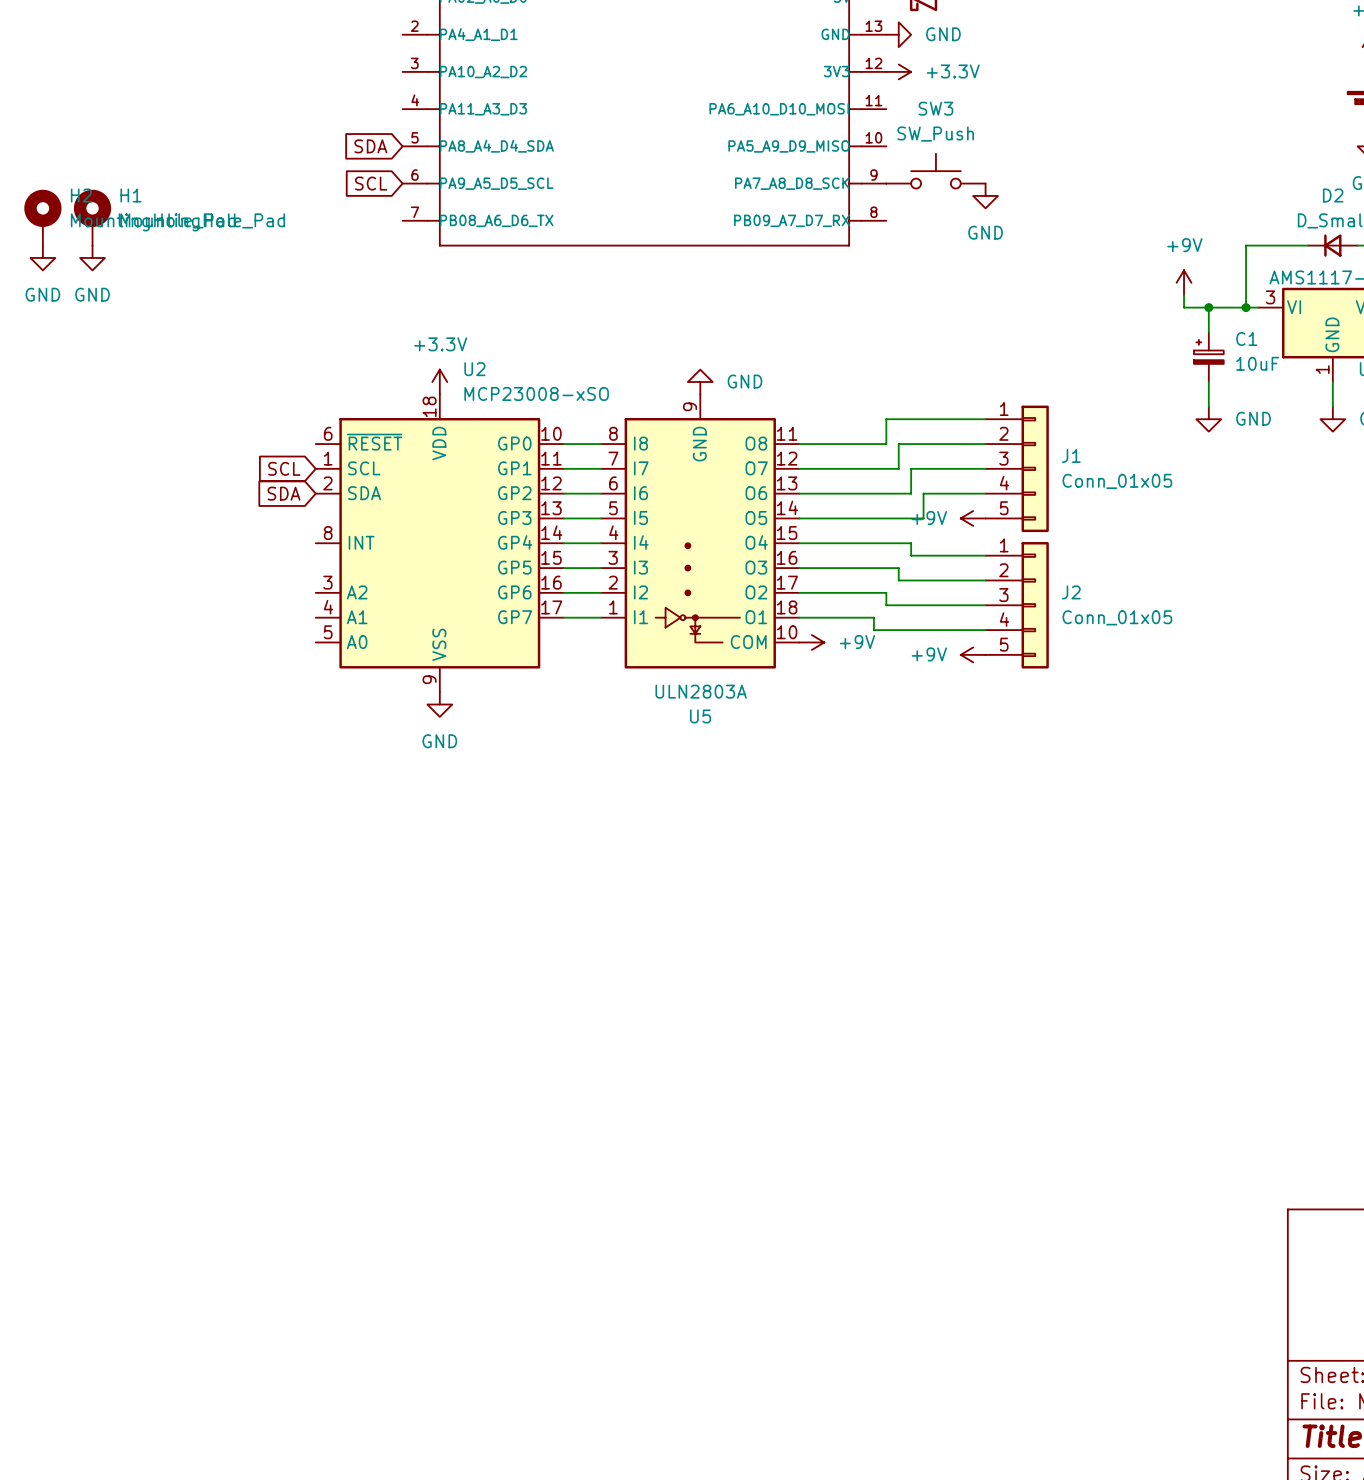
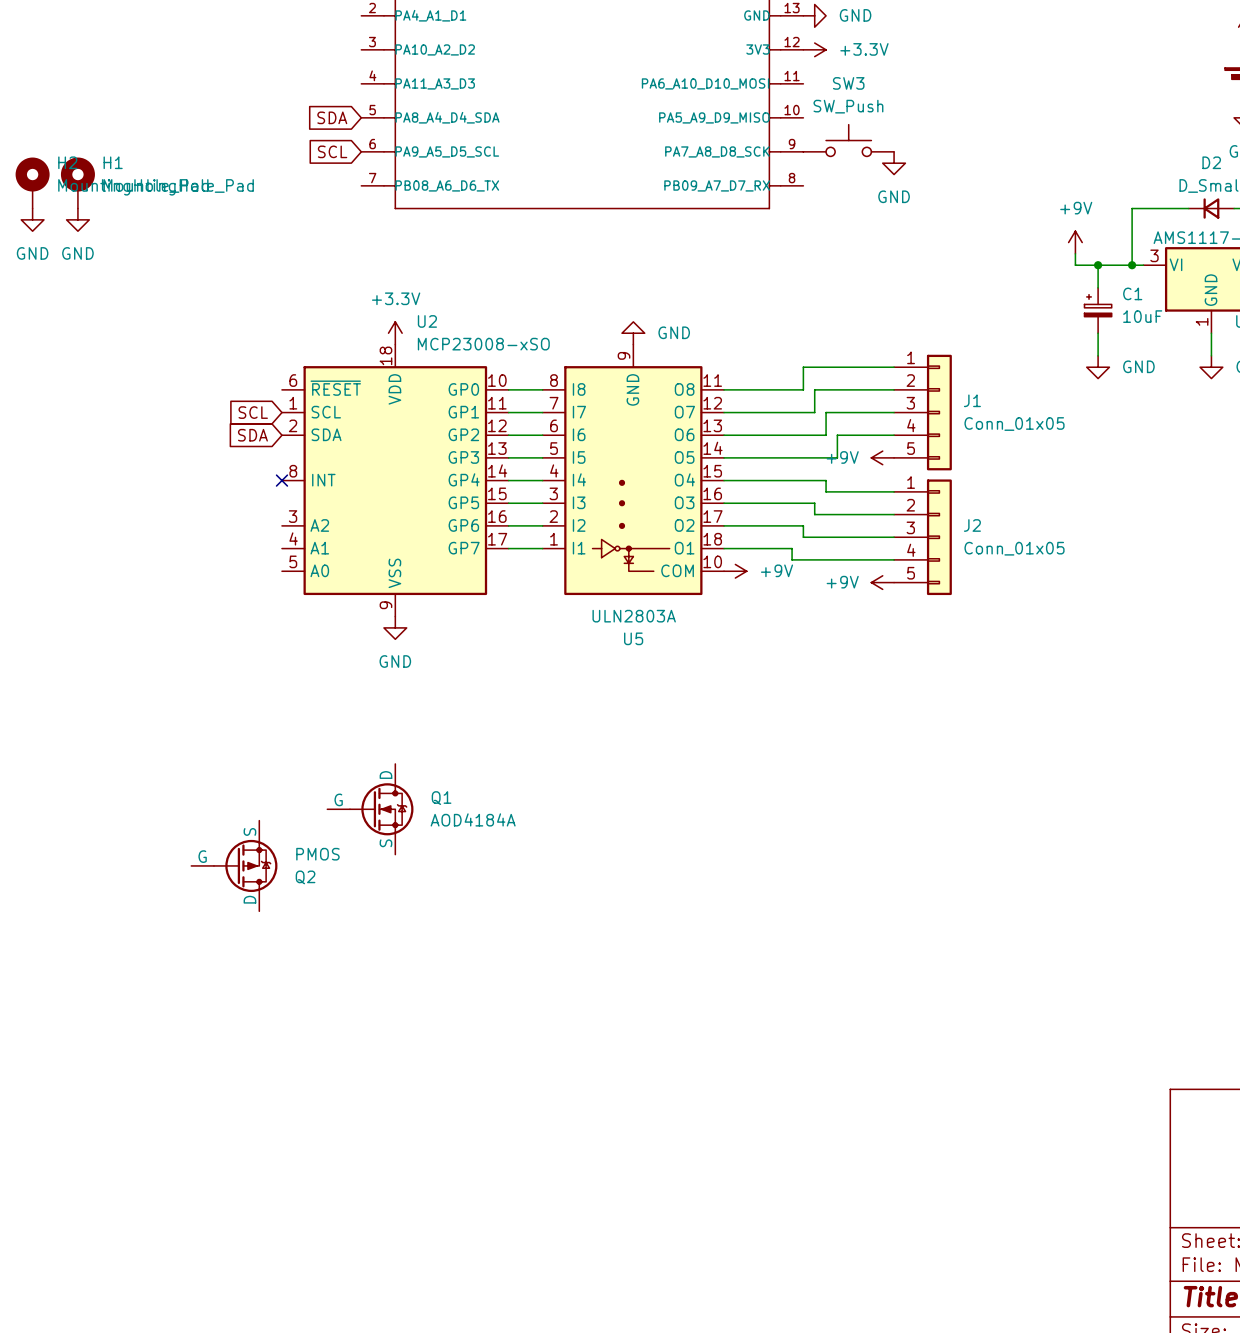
no-connect mark: none -> (281, 480)
Q1: none -> AOD4184A (370, 809)
Q2: none -> PMOS (234, 865)

